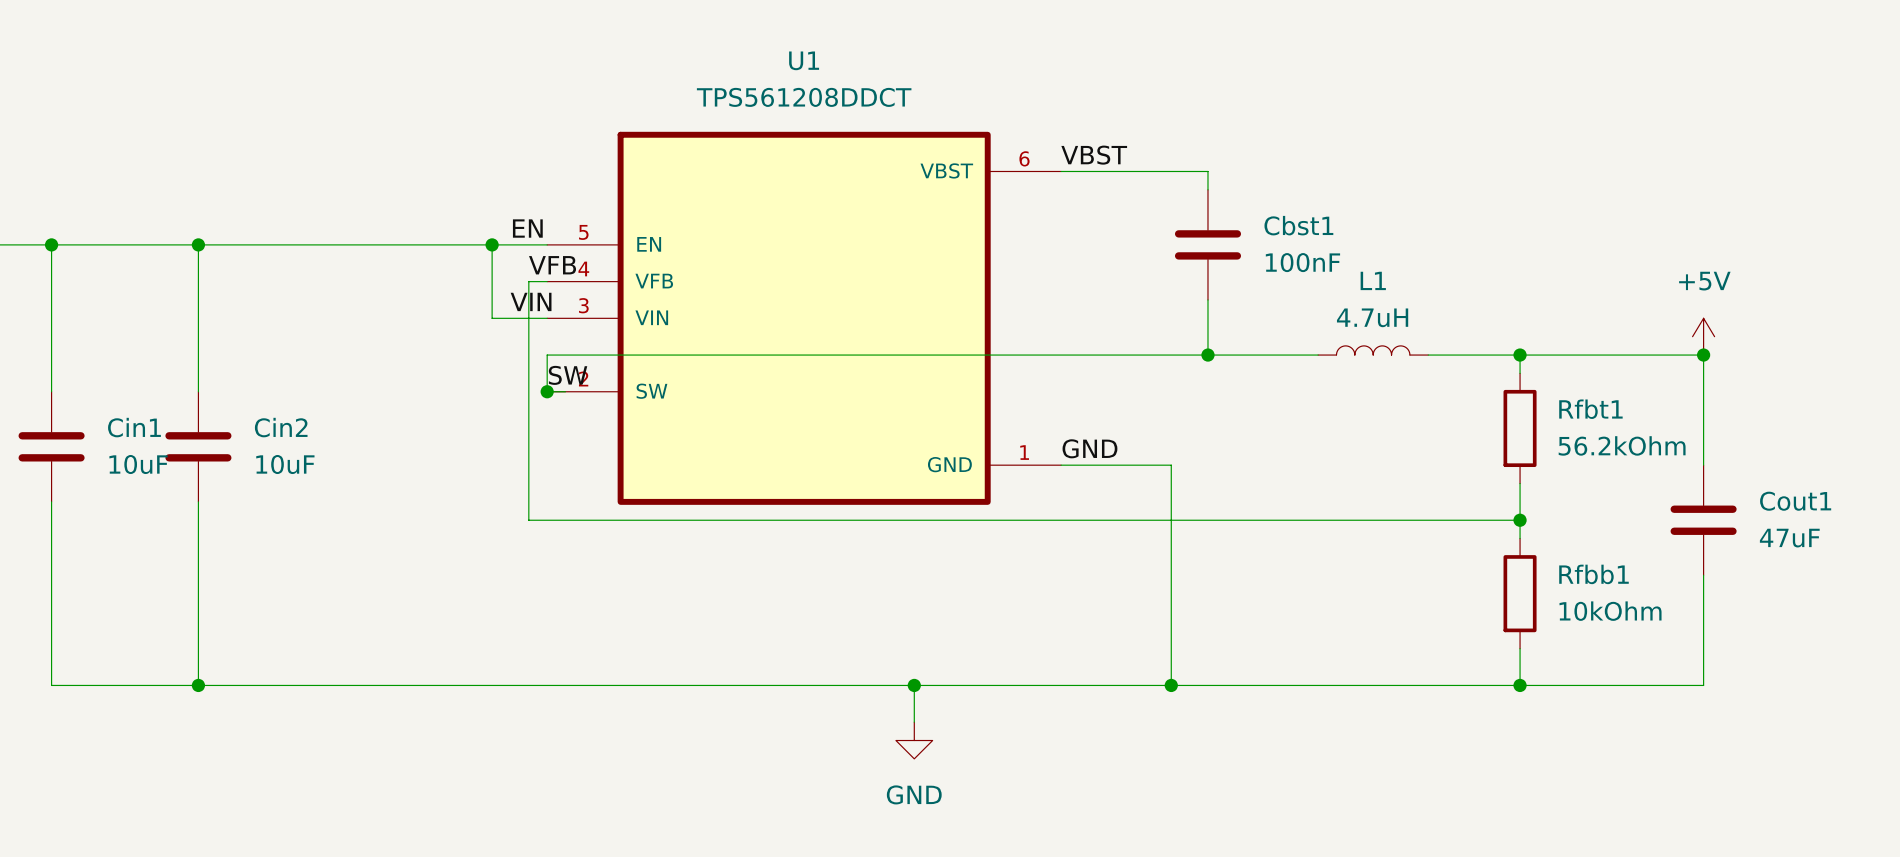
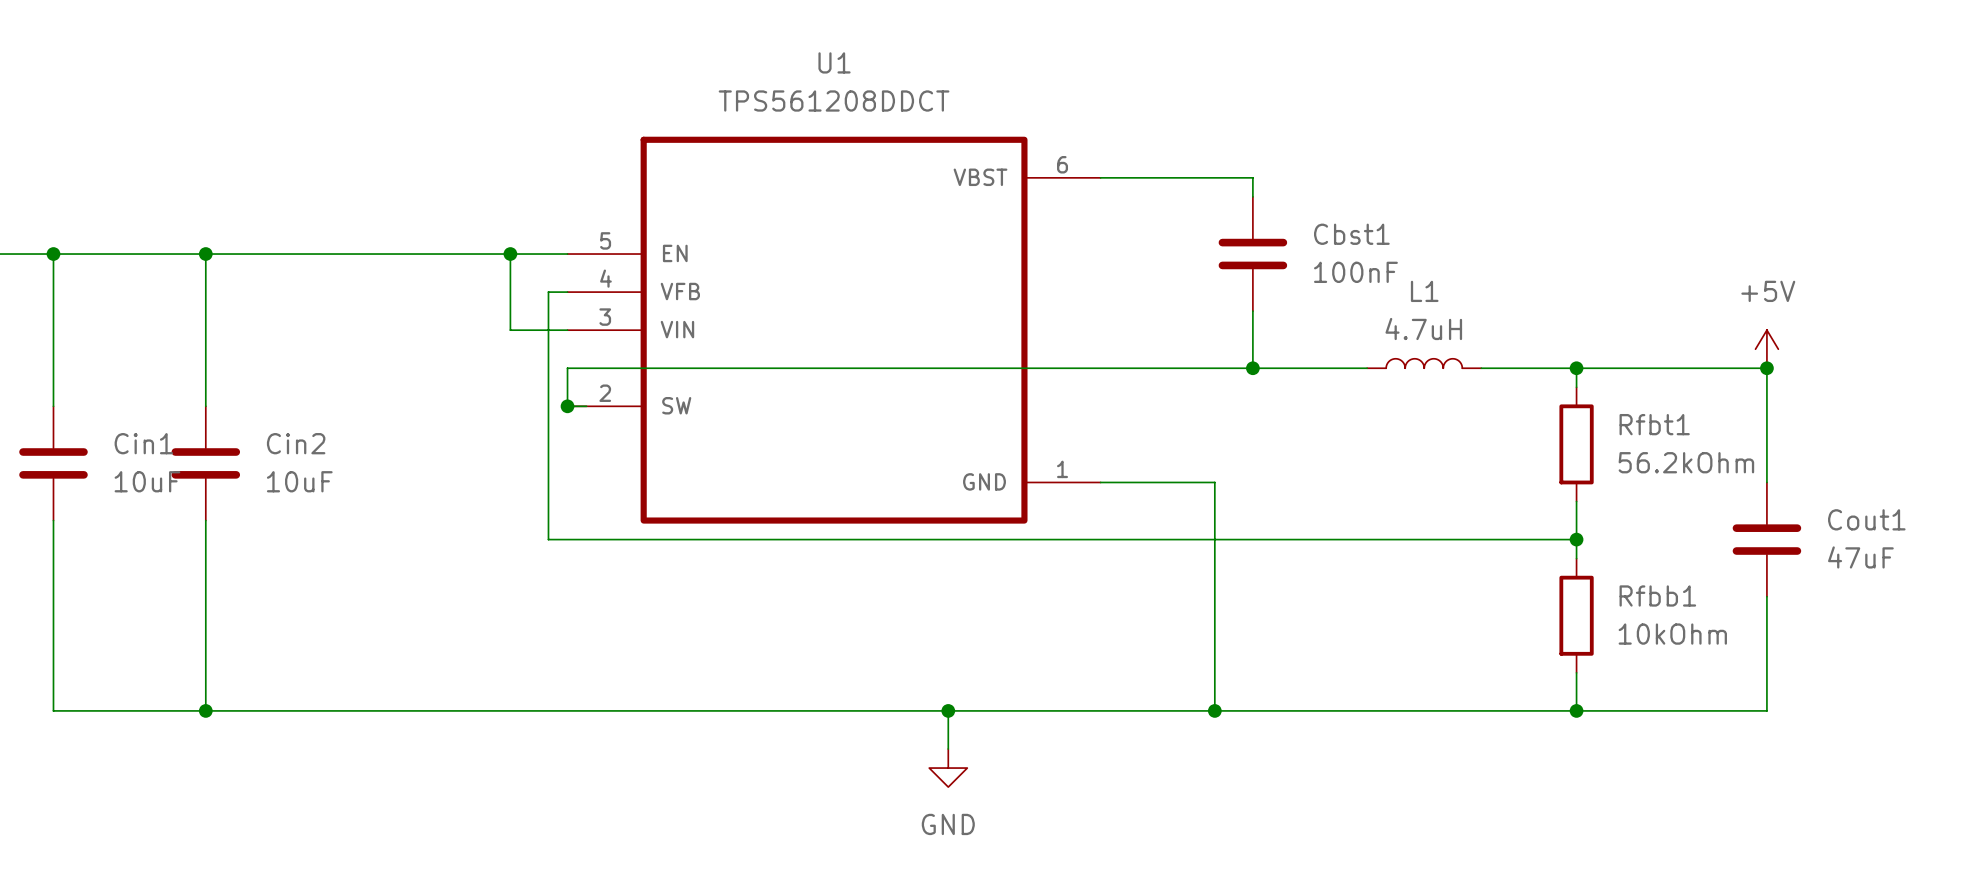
label: VBST (1094, 155) -> none
label: EN (527, 228) -> none
label: VFB (552, 265) -> none
label: VIN (531, 301) -> none
label: SW (568, 375) -> none
label: GND (1089, 448) -> none

